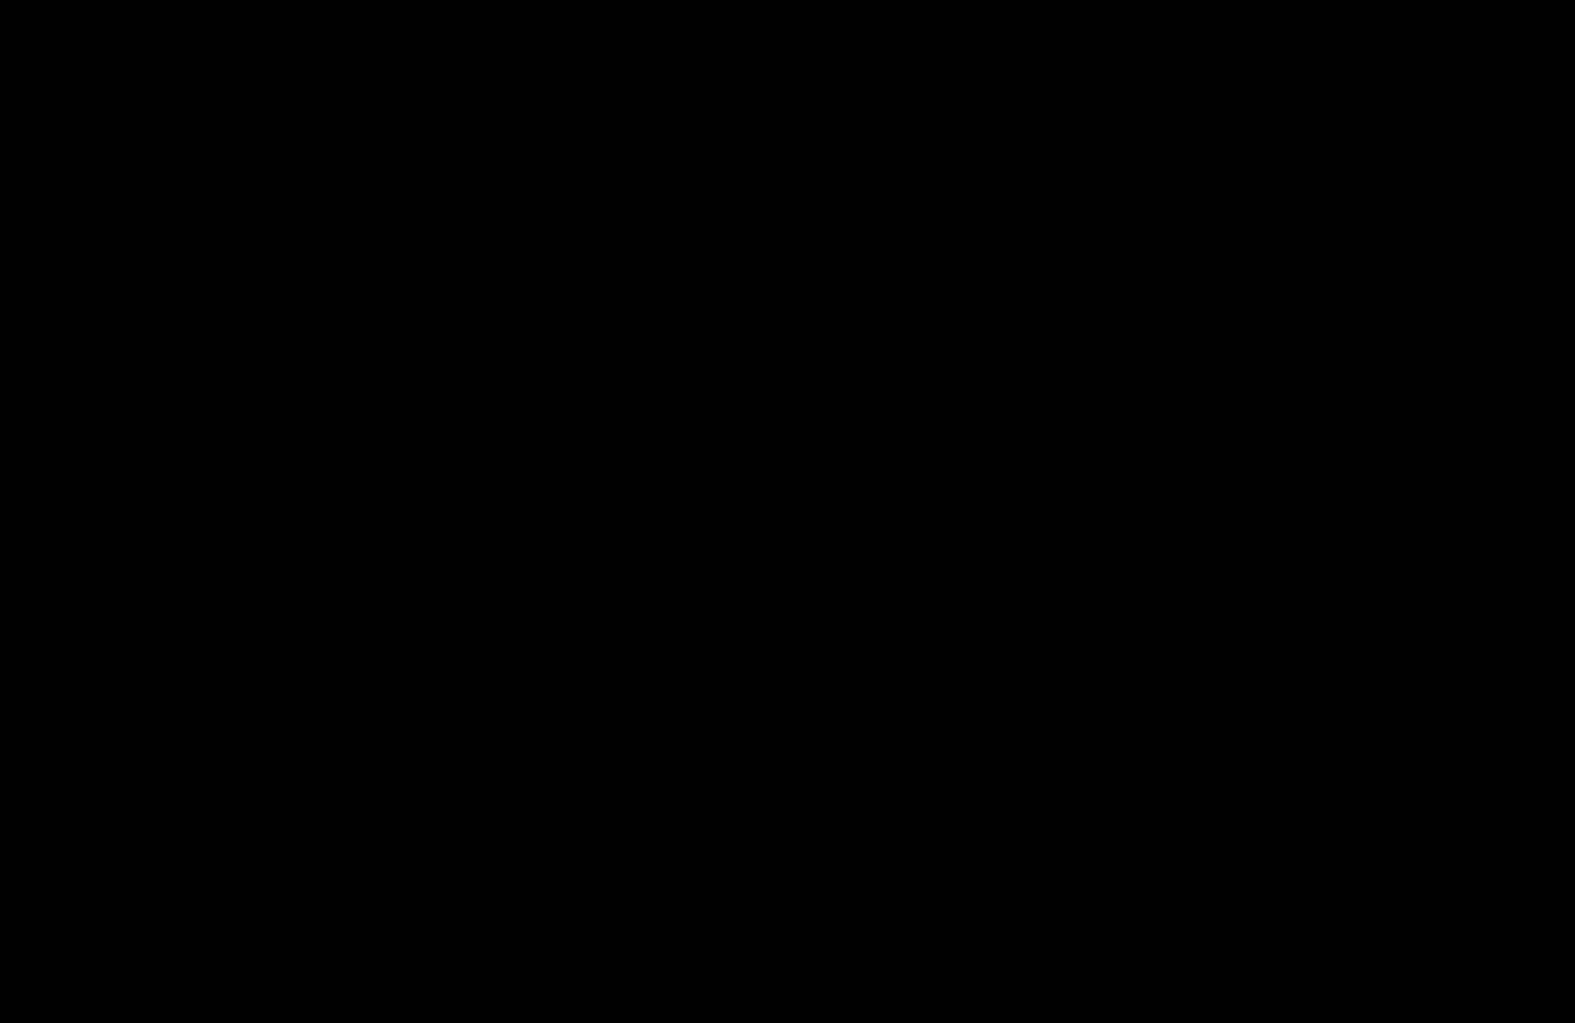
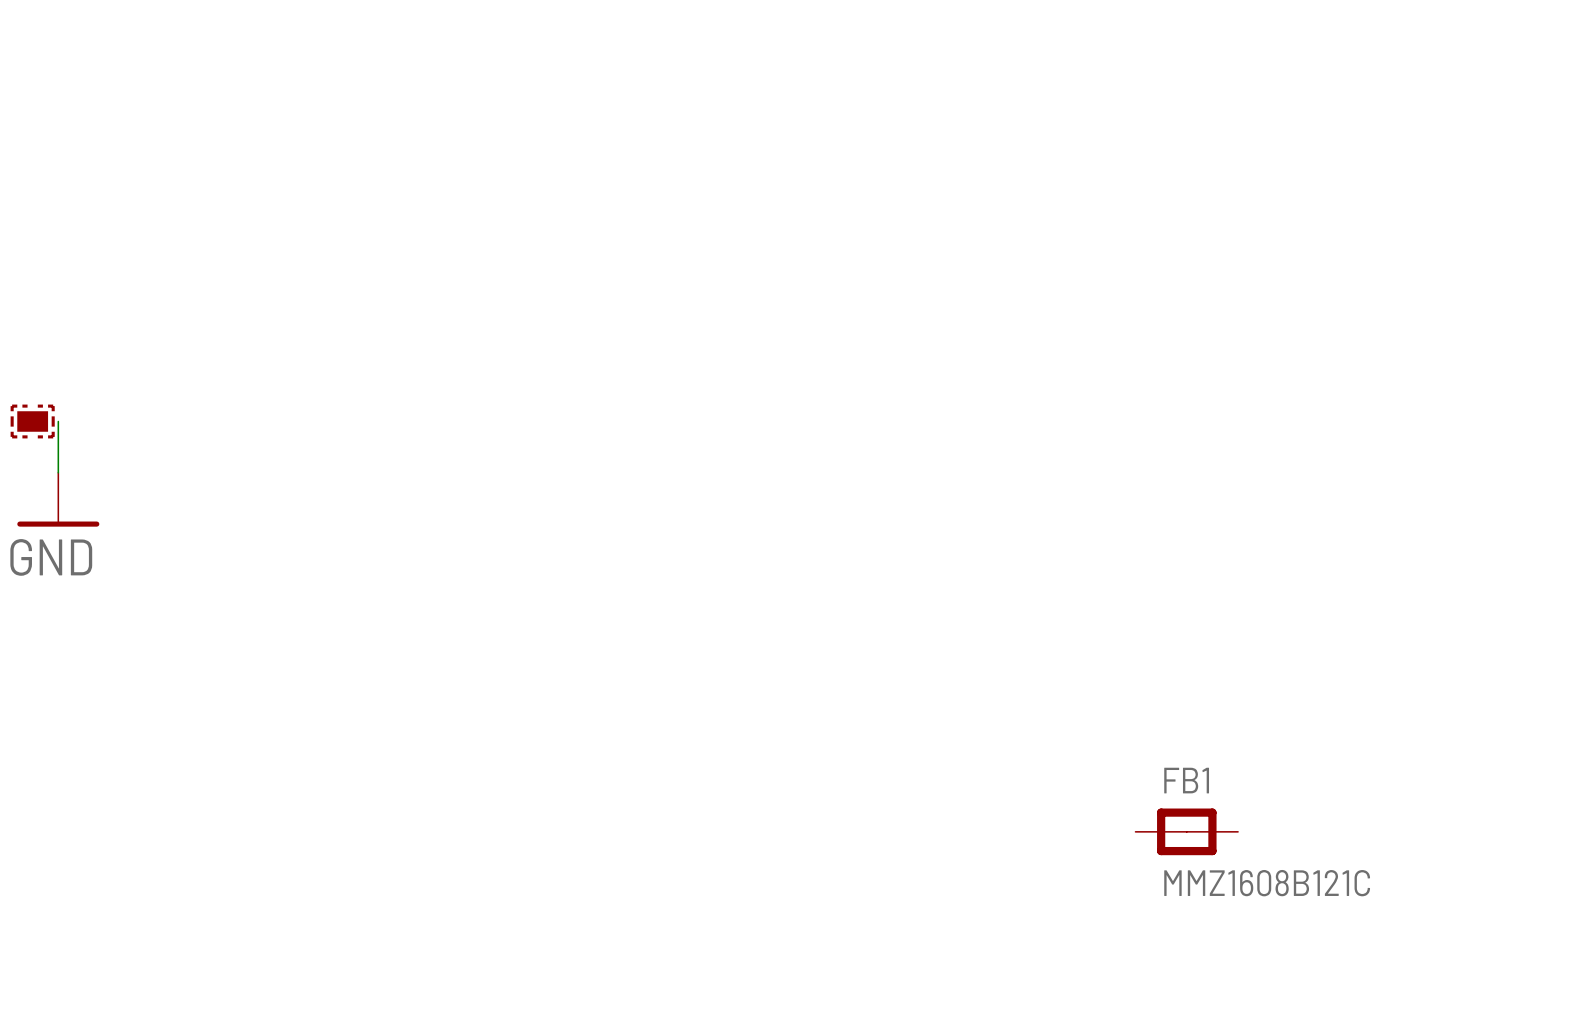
part: none -> (32, 421)
wire: none -> (58, 421) (58, 472)
power symbol: none -> GND (58, 499)
FB1: none -> MMZ1608B121C (1186, 831)

